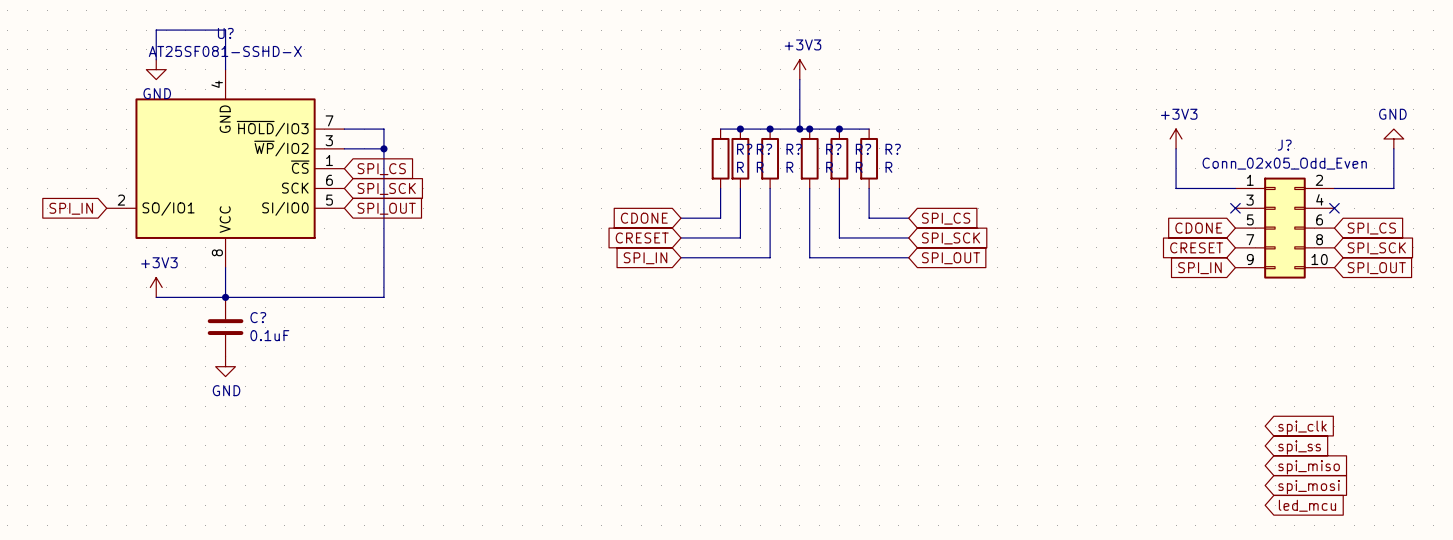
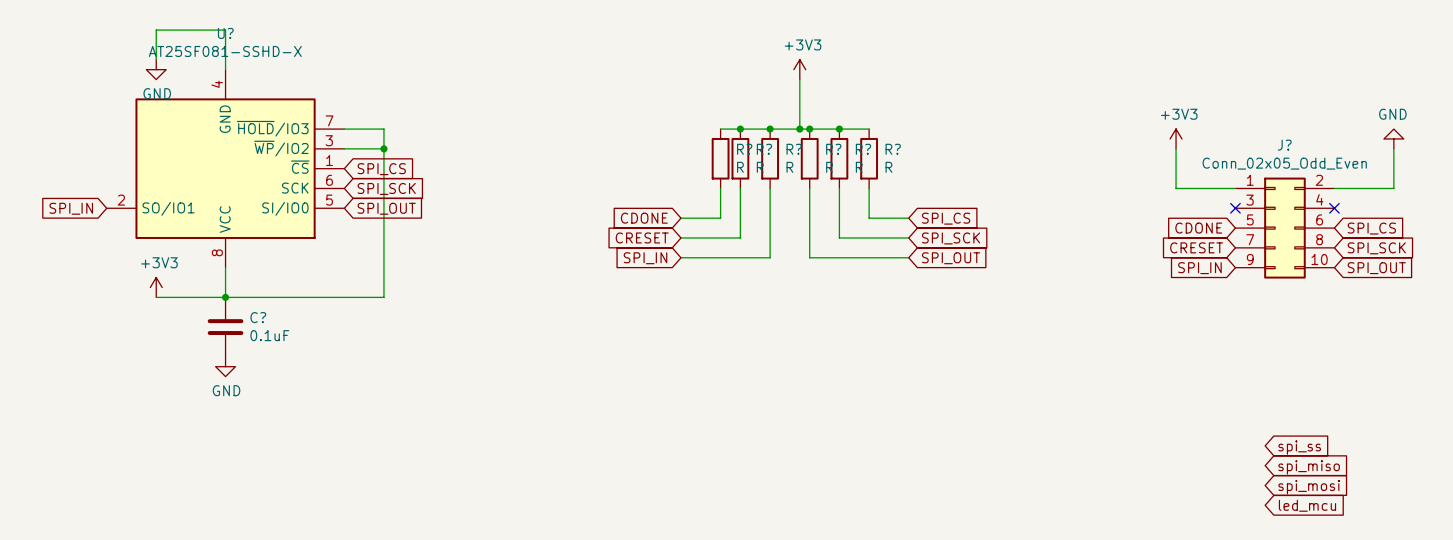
global label: spi_clk (1302, 427) -> none

